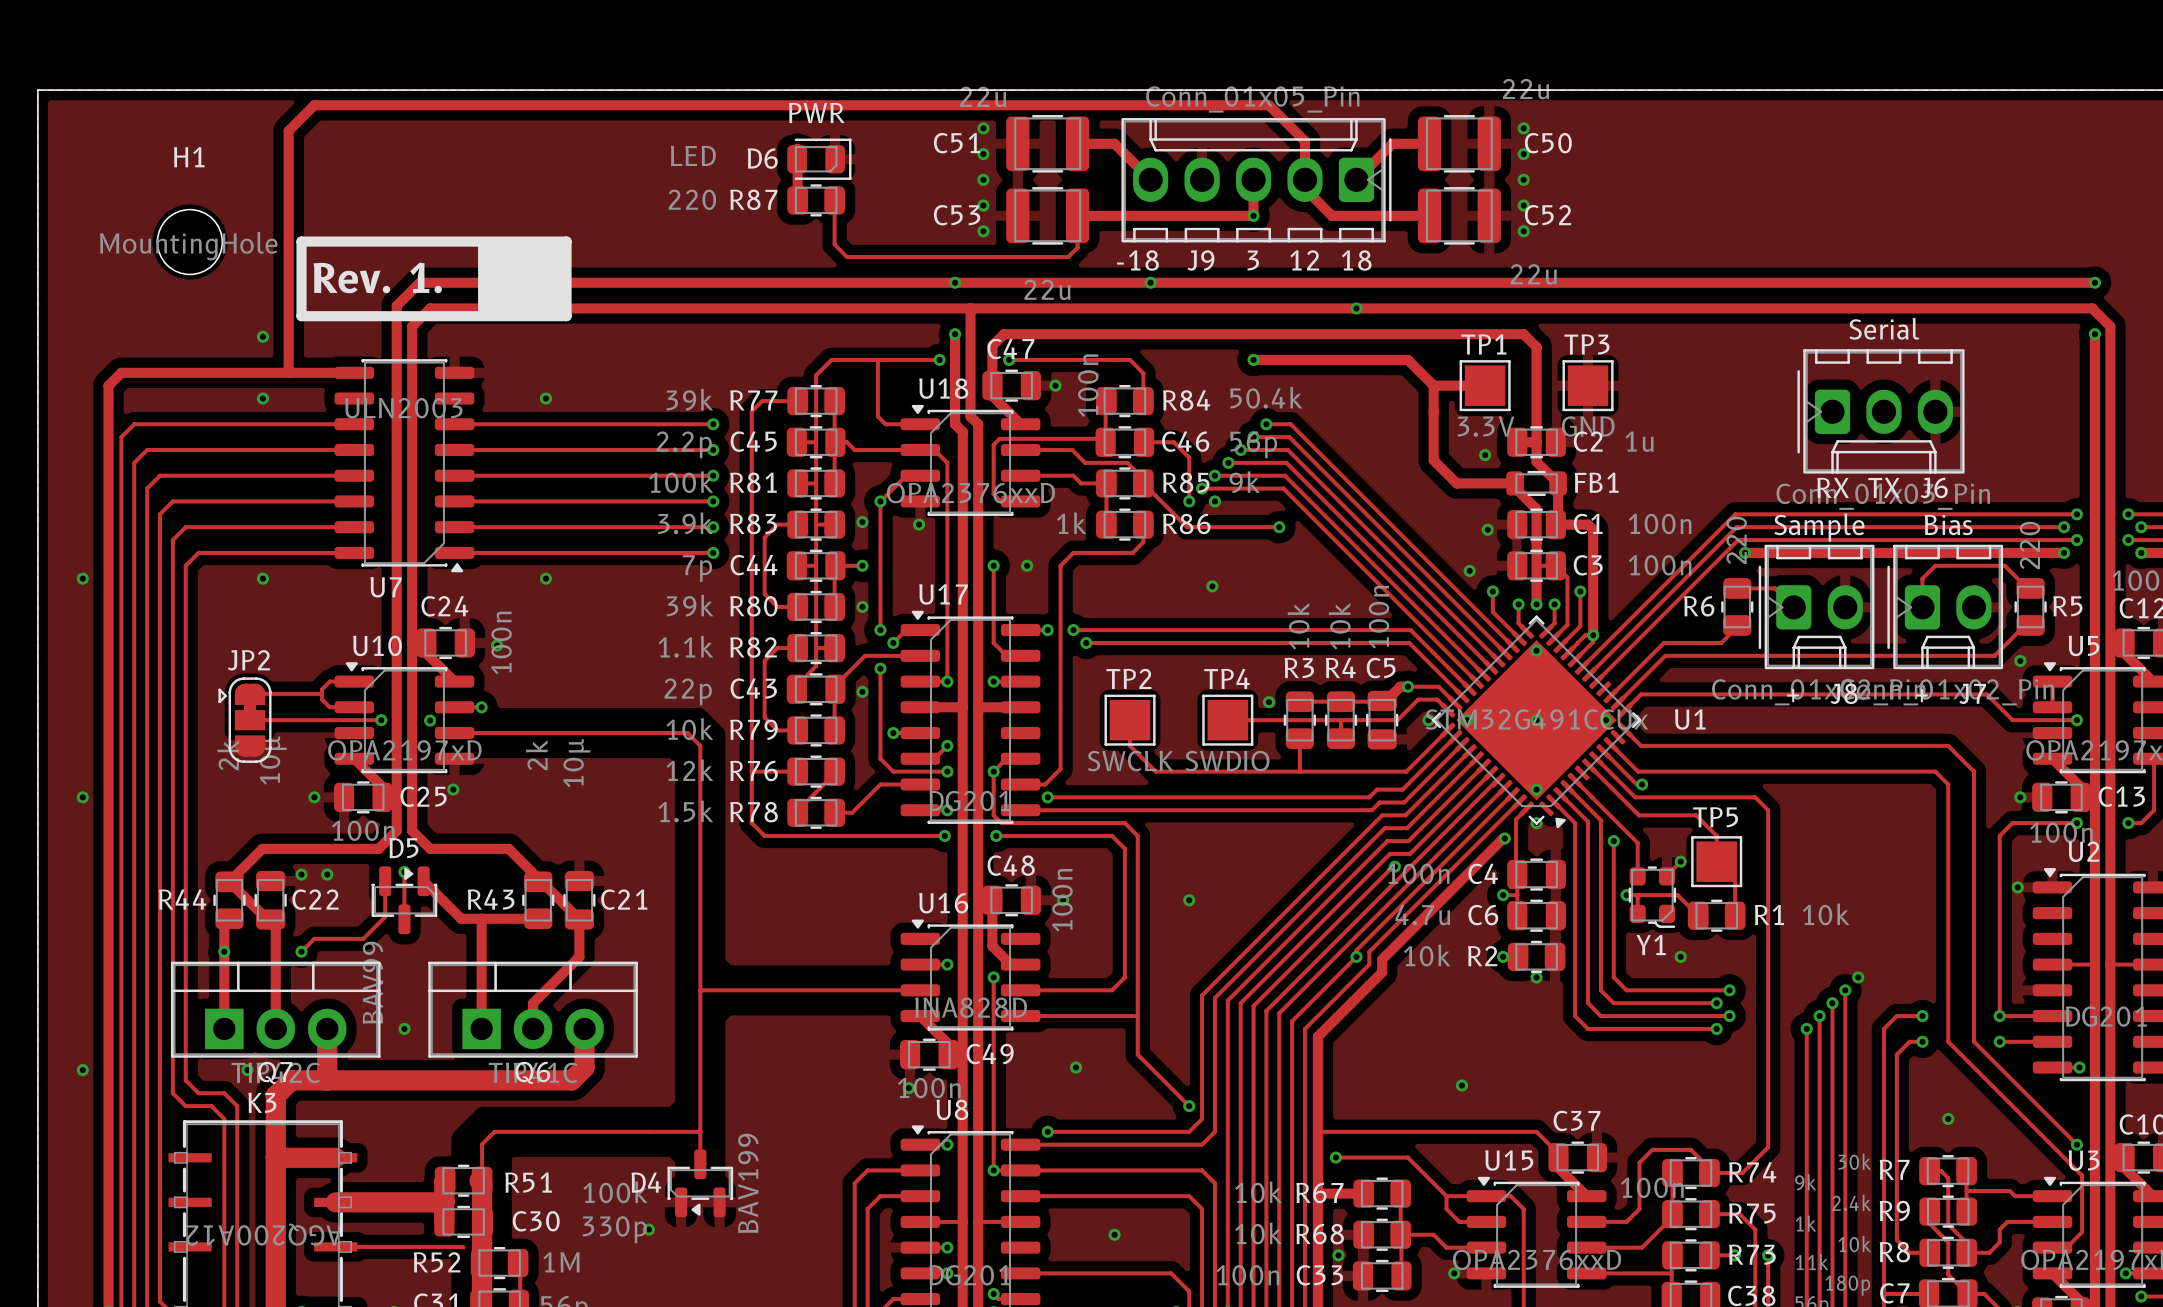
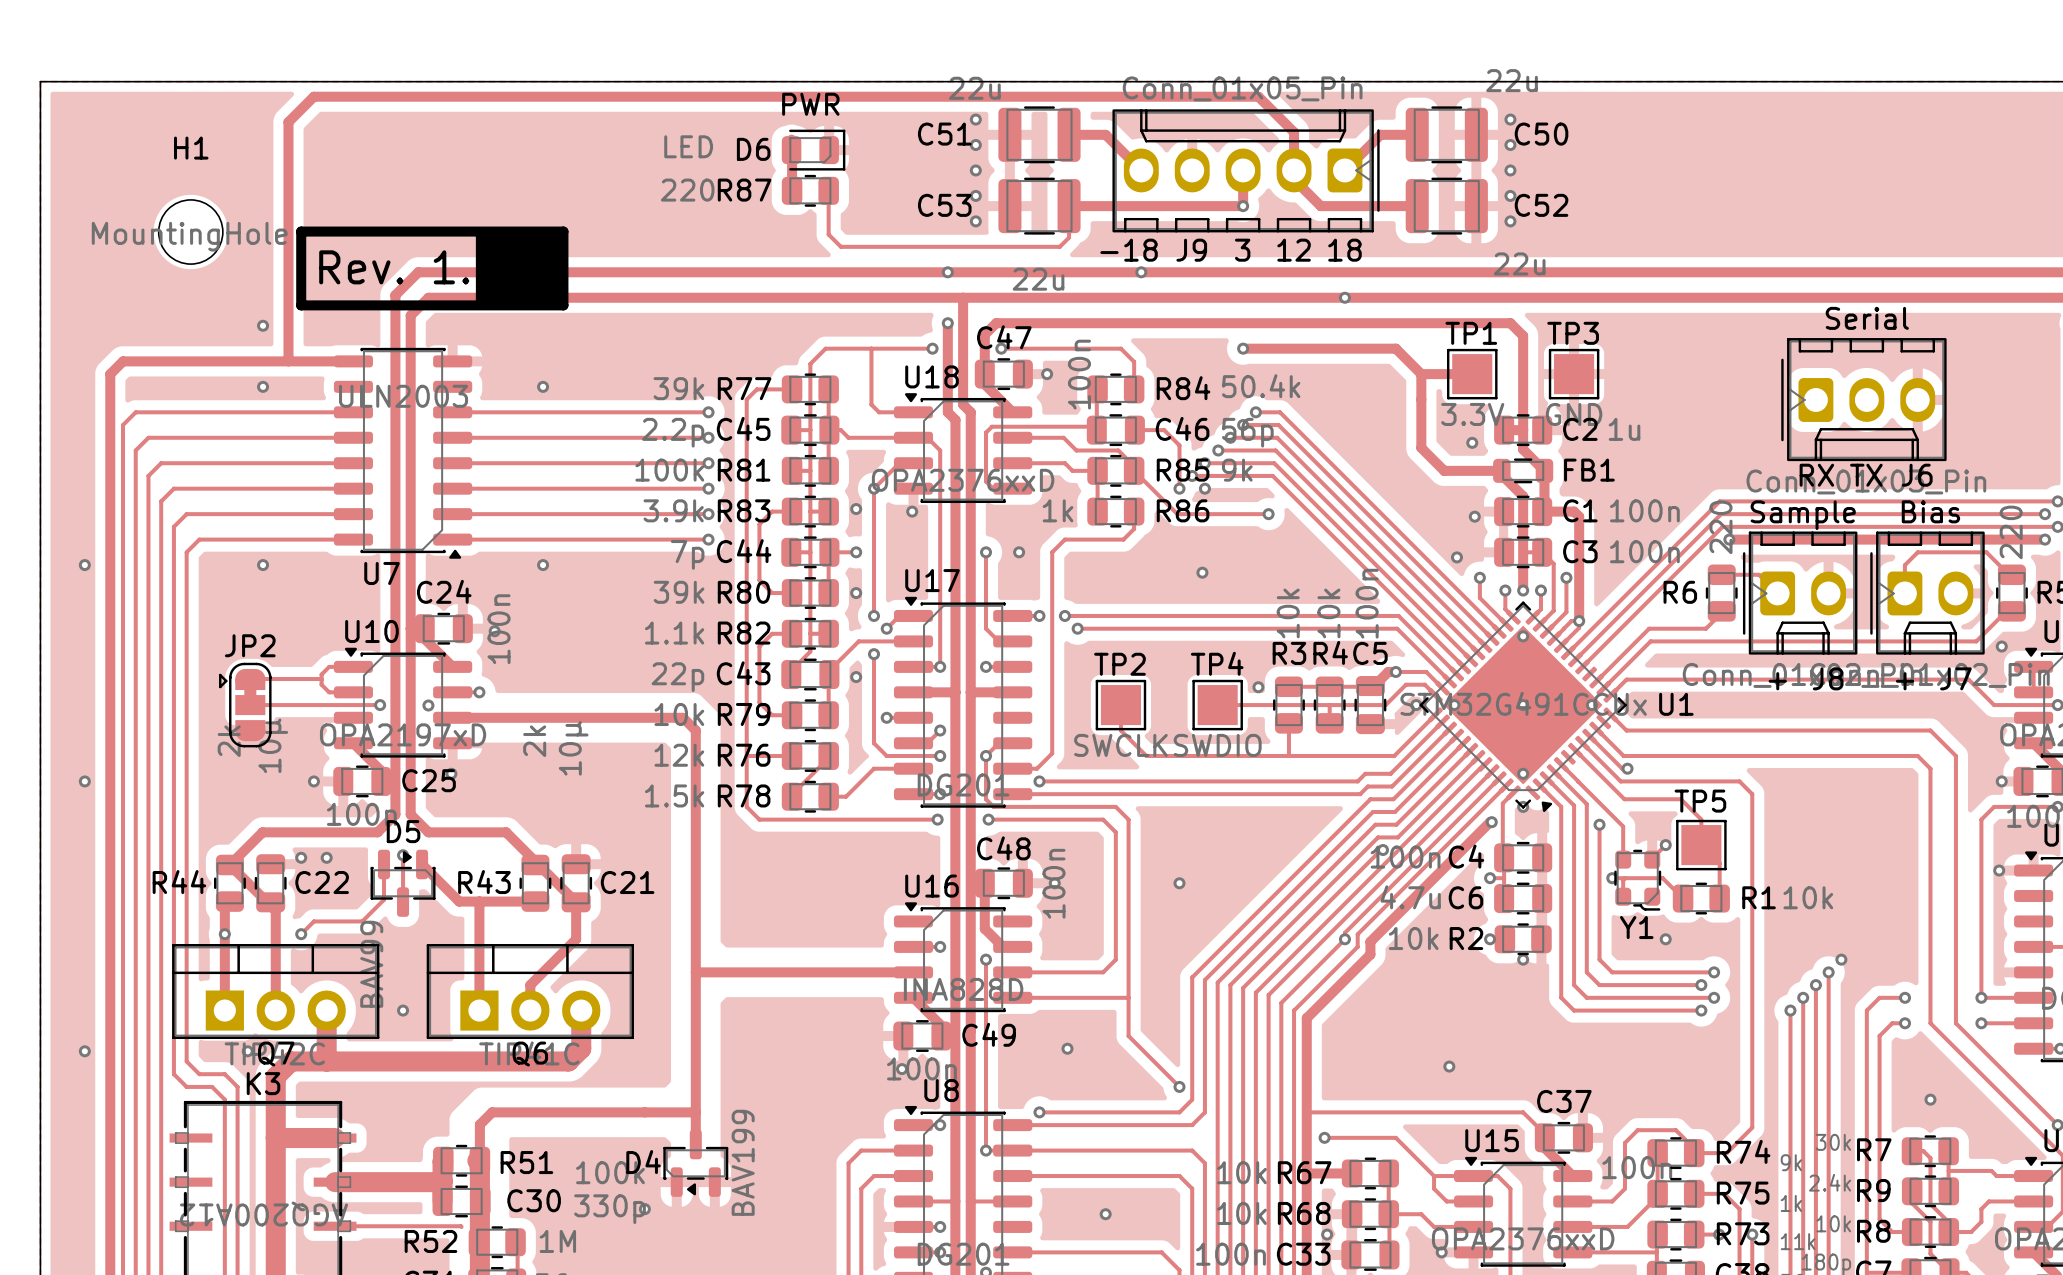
track width: thin (454, 733) (687, 733) (700, 745) (700, 1164) -> thick (452, 717) (683, 717) (695, 730) (695, 1144)
track width: thin (700, 990) (920, 990) -> thick (695, 972) (913, 972)
track width: thin (700, 1131) (494, 1131) (482, 1144) (482, 1180) -> thick (695, 1112) (492, 1112) (479, 1124) (479, 1160)

